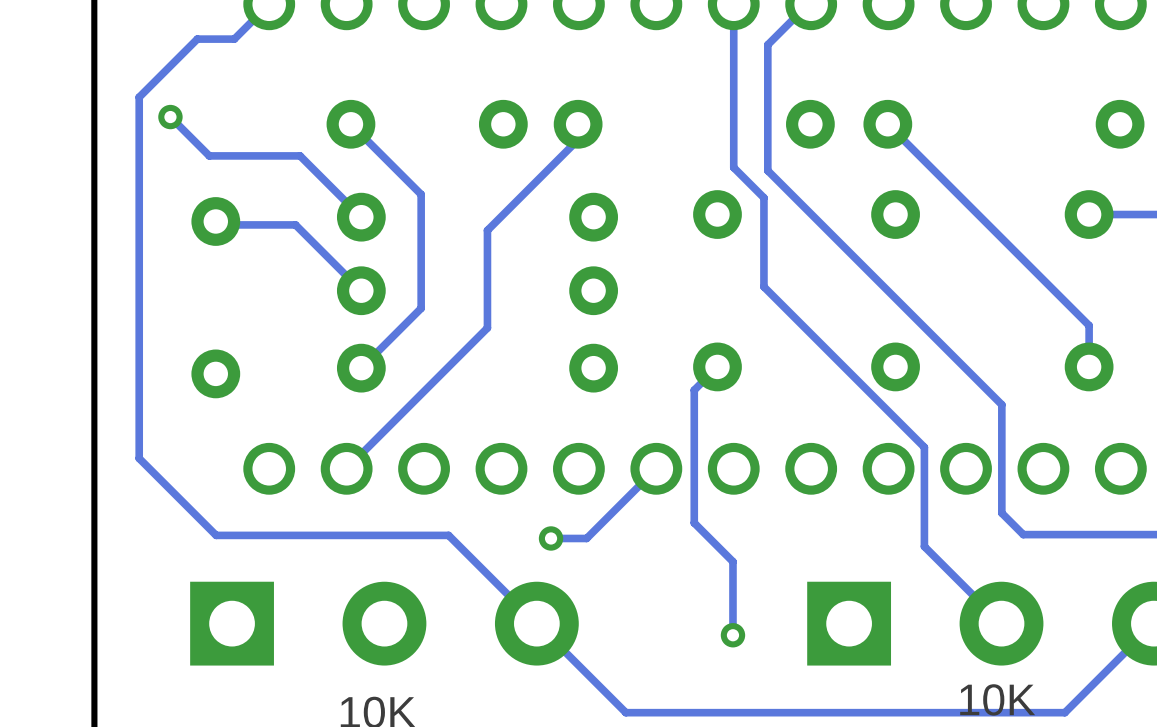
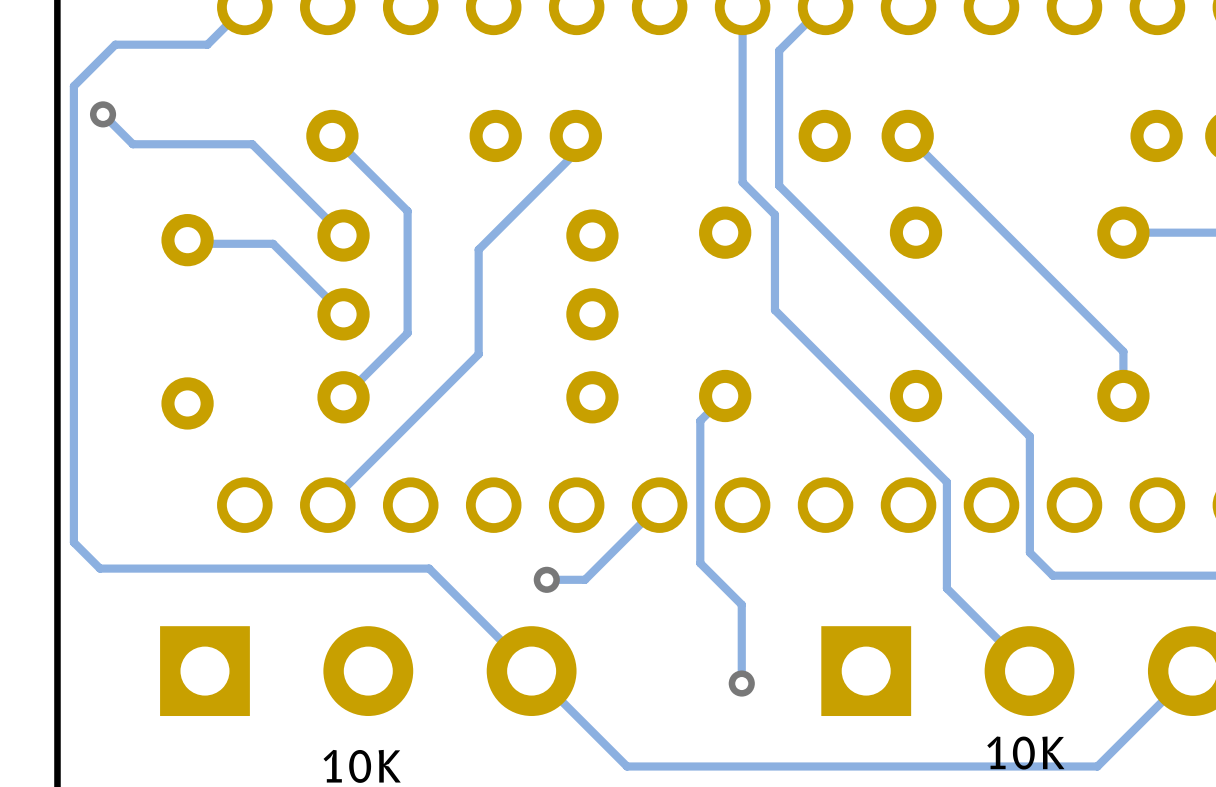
track: (197, 39) (139, 97) (139, 458) (216, 535) (448, 535) -> (167, 44) (115, 44) (73, 86) (73, 542) (99, 568) (429, 568) (437, 576)
track: (170, 117) (209, 155) (300, 155) -> (103, 114) (132, 144) (252, 144) (277, 169)
via position: (170, 117) -> (103, 114)

